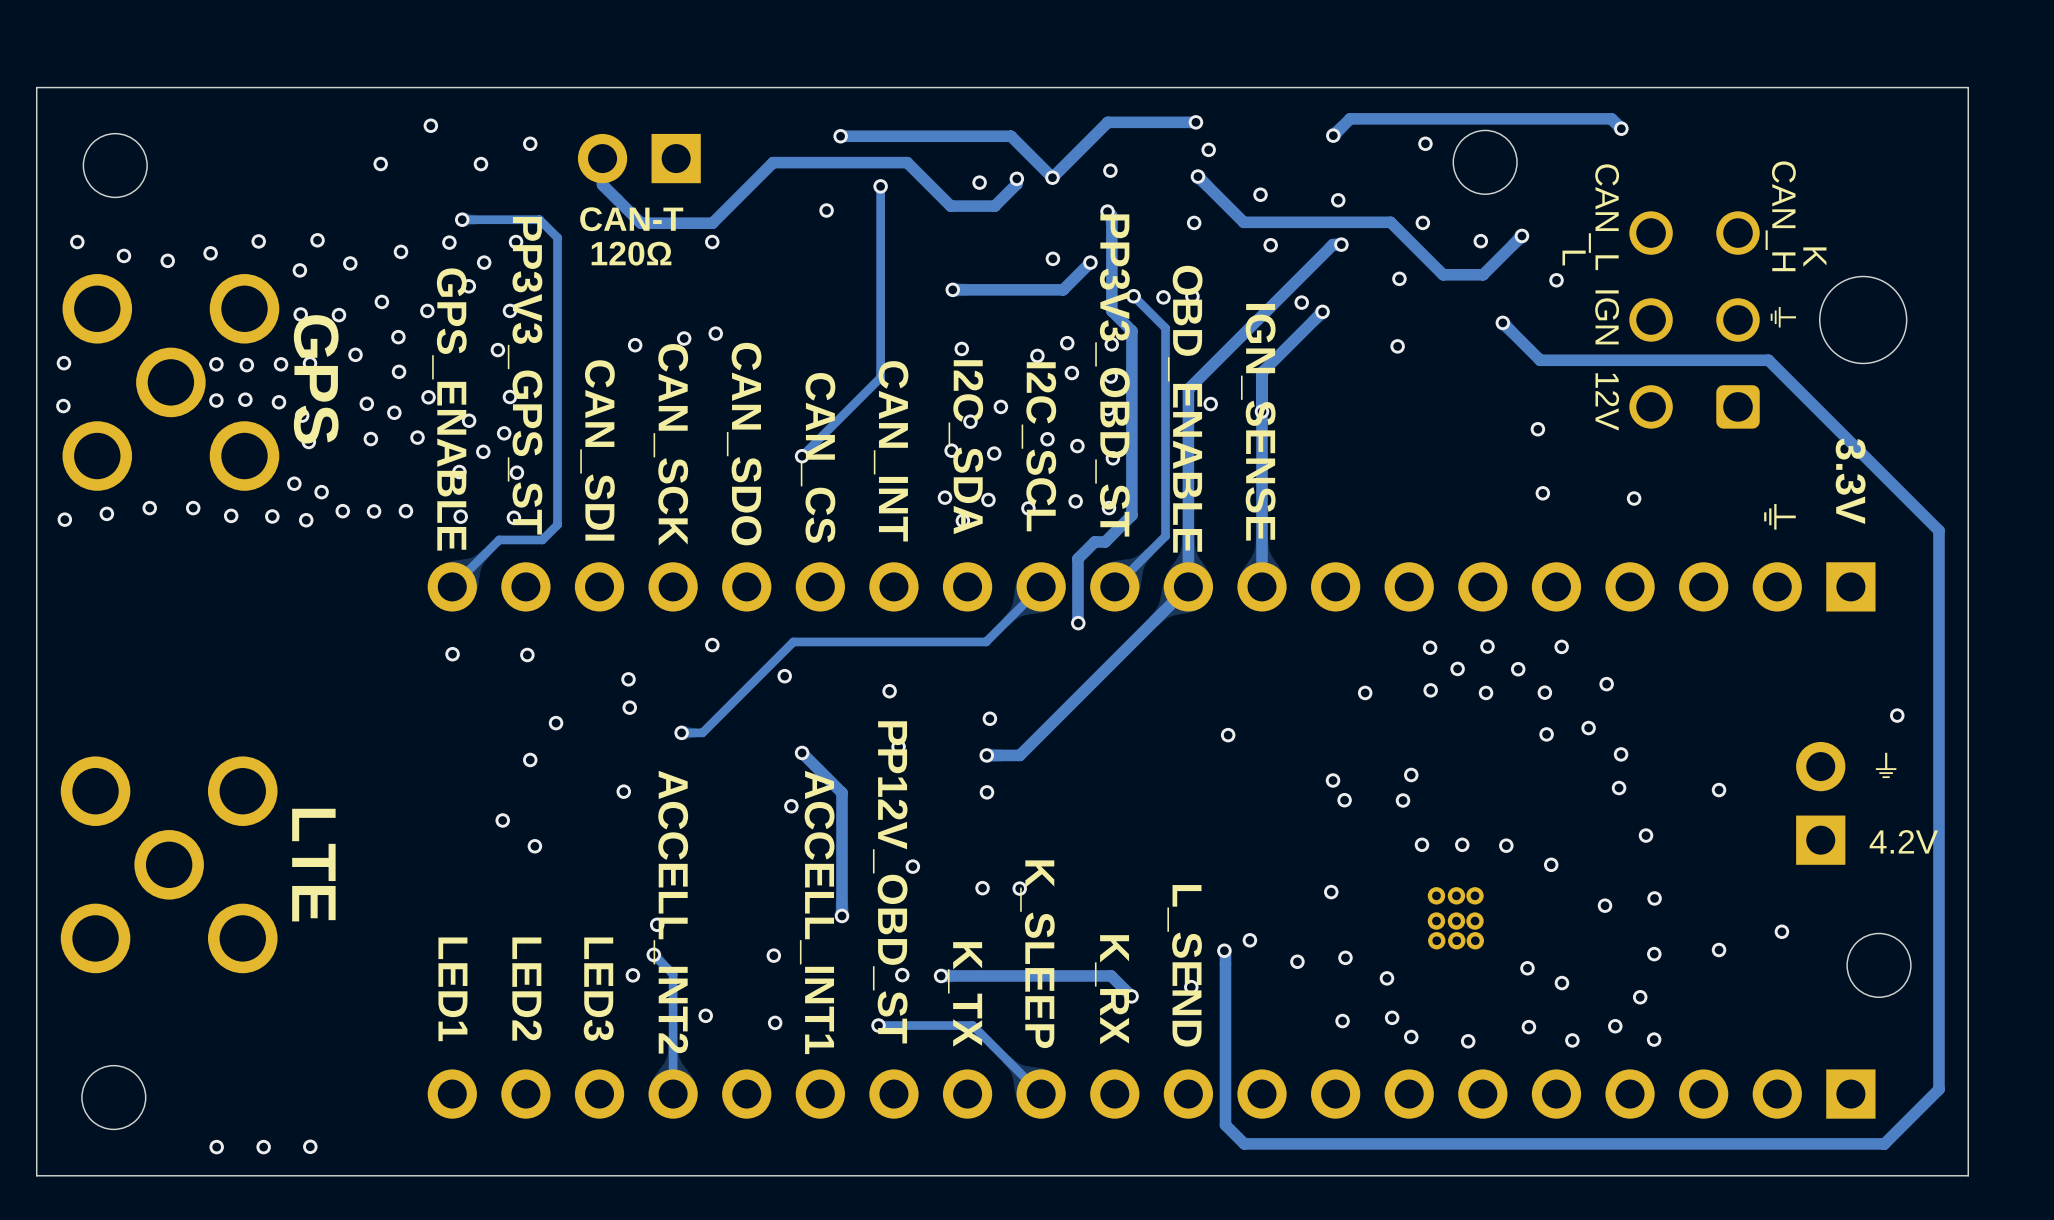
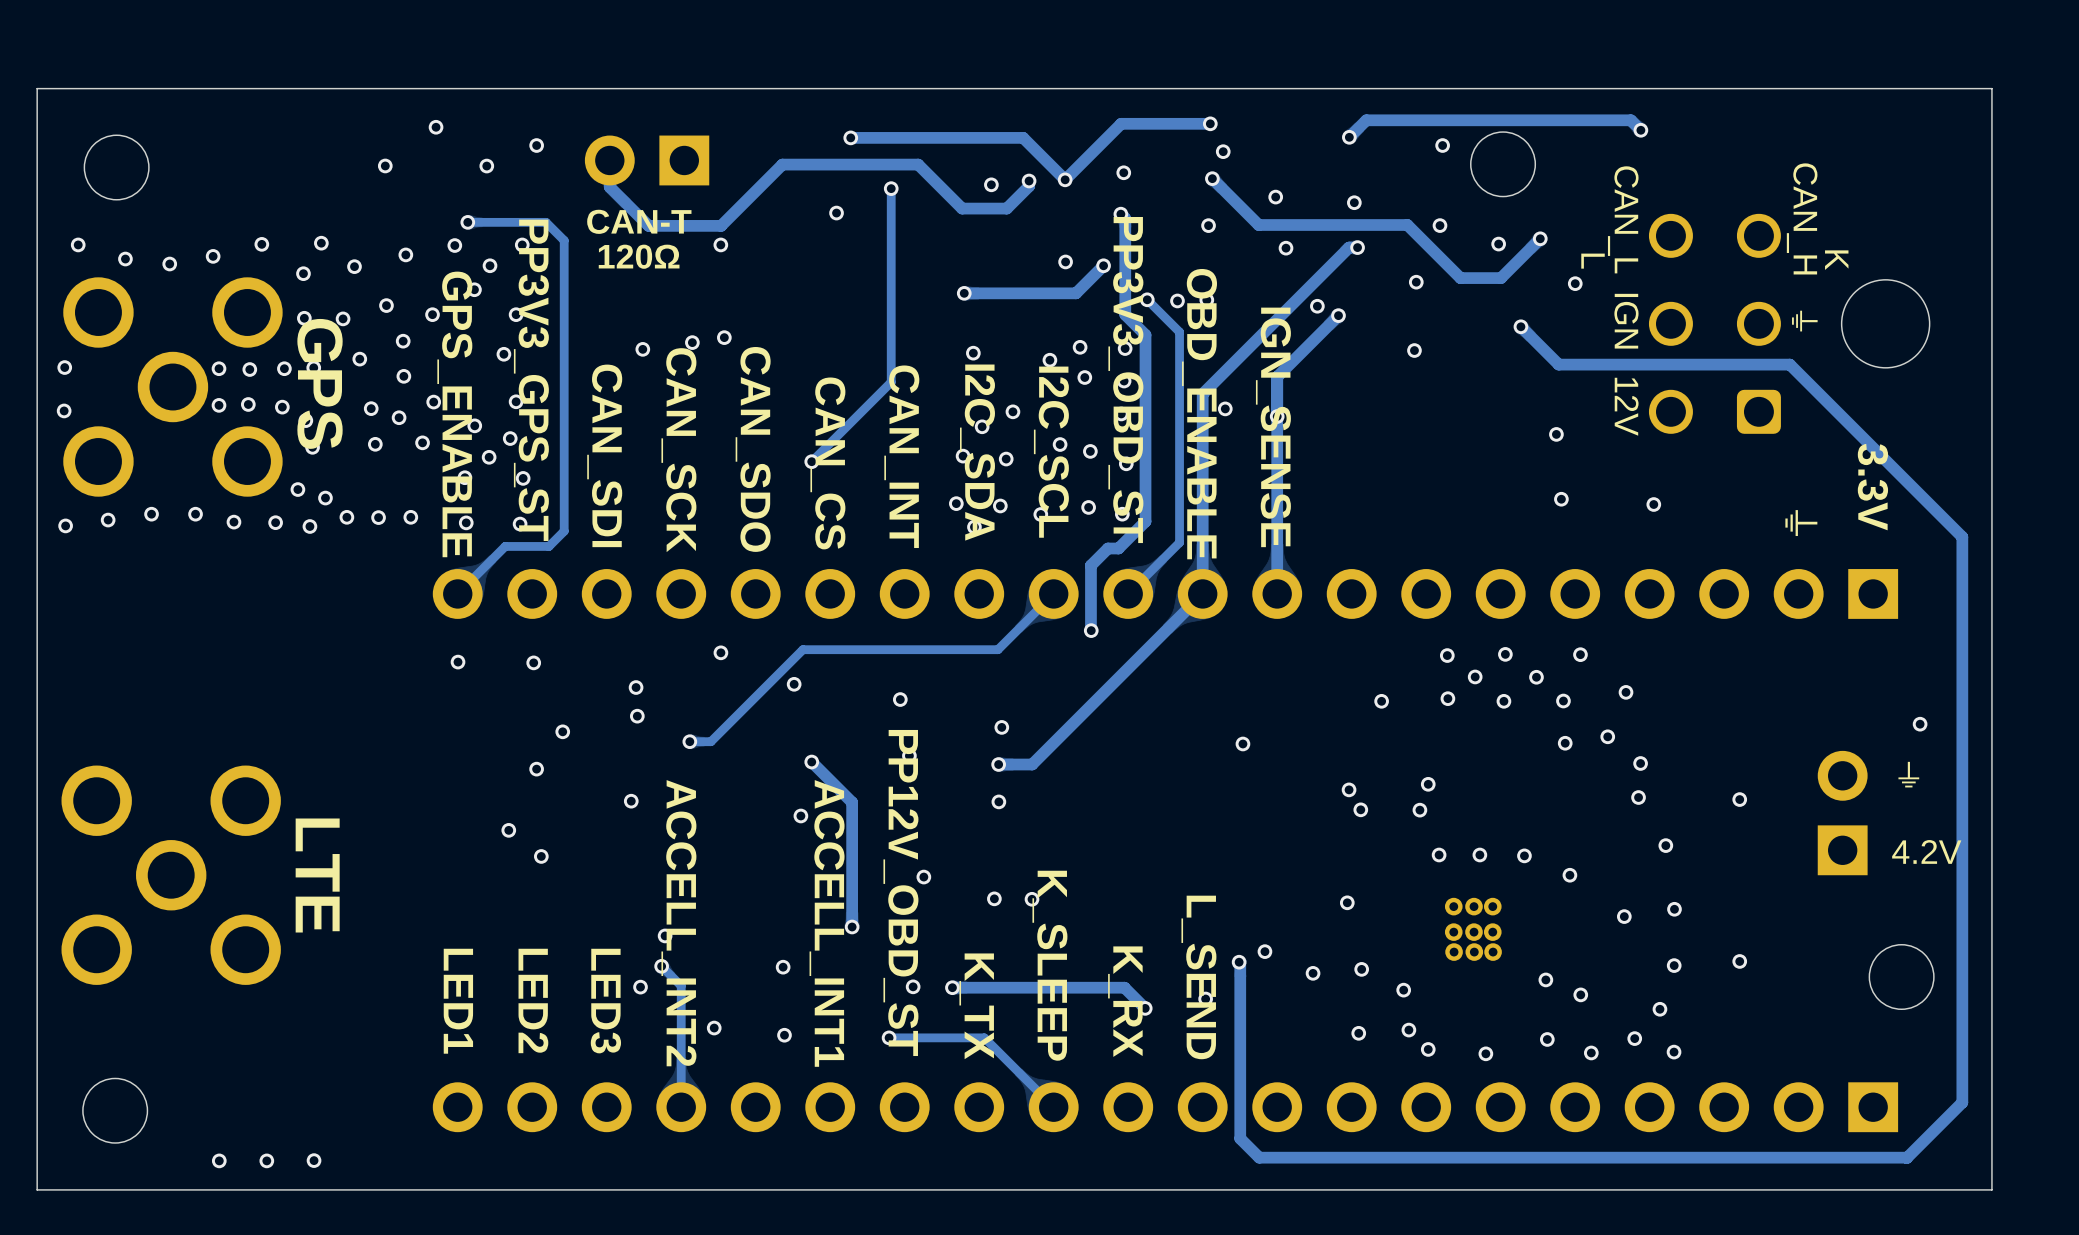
via: (1781, 931) -> none

